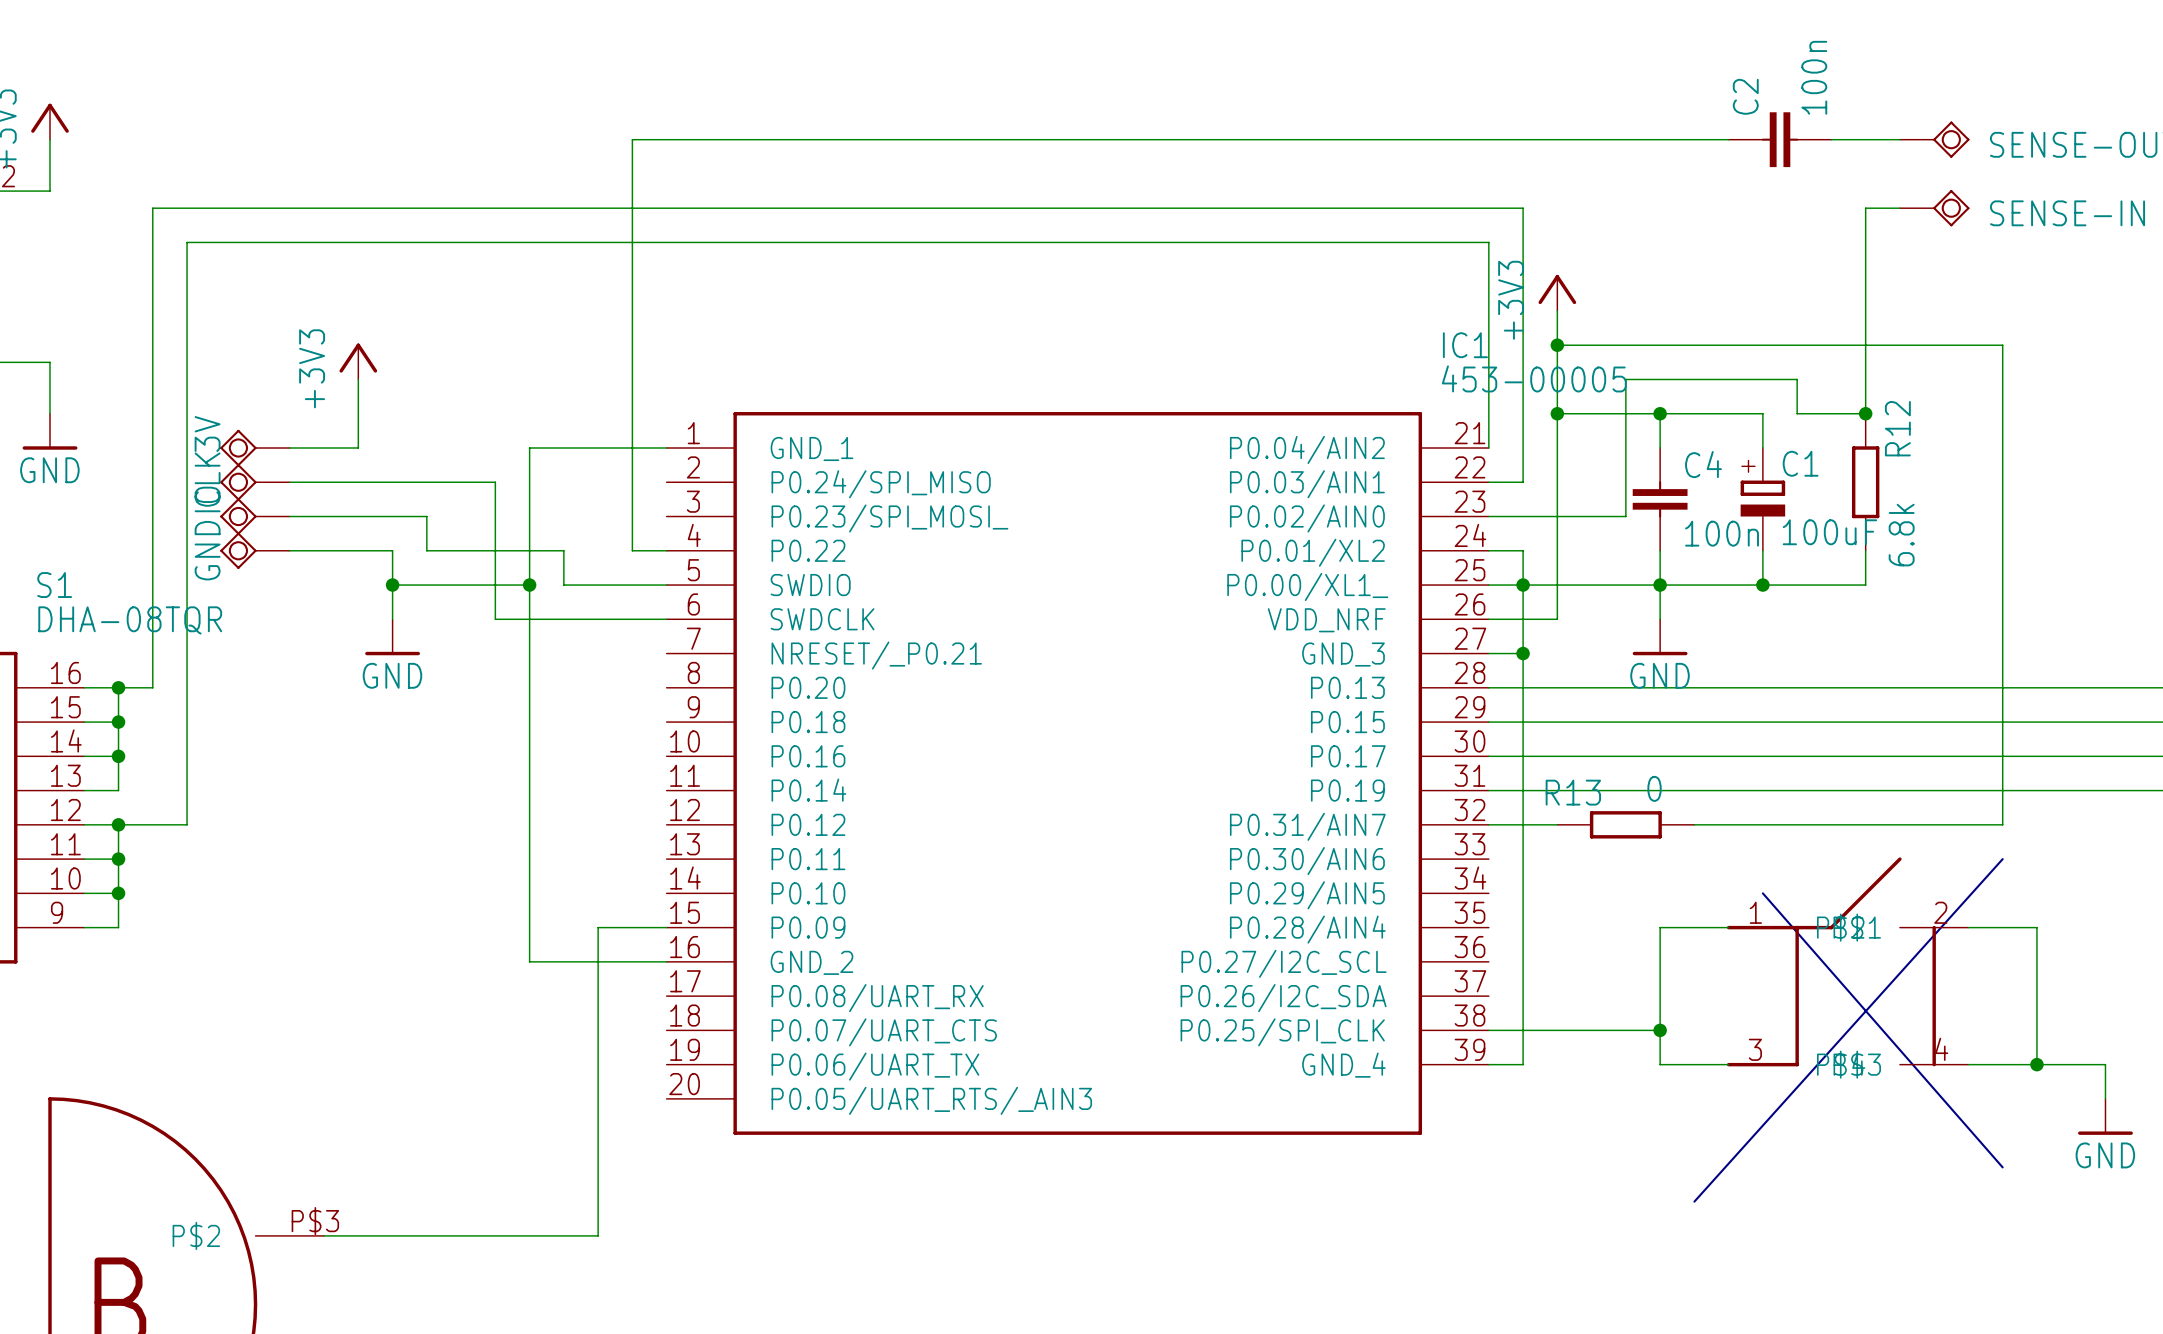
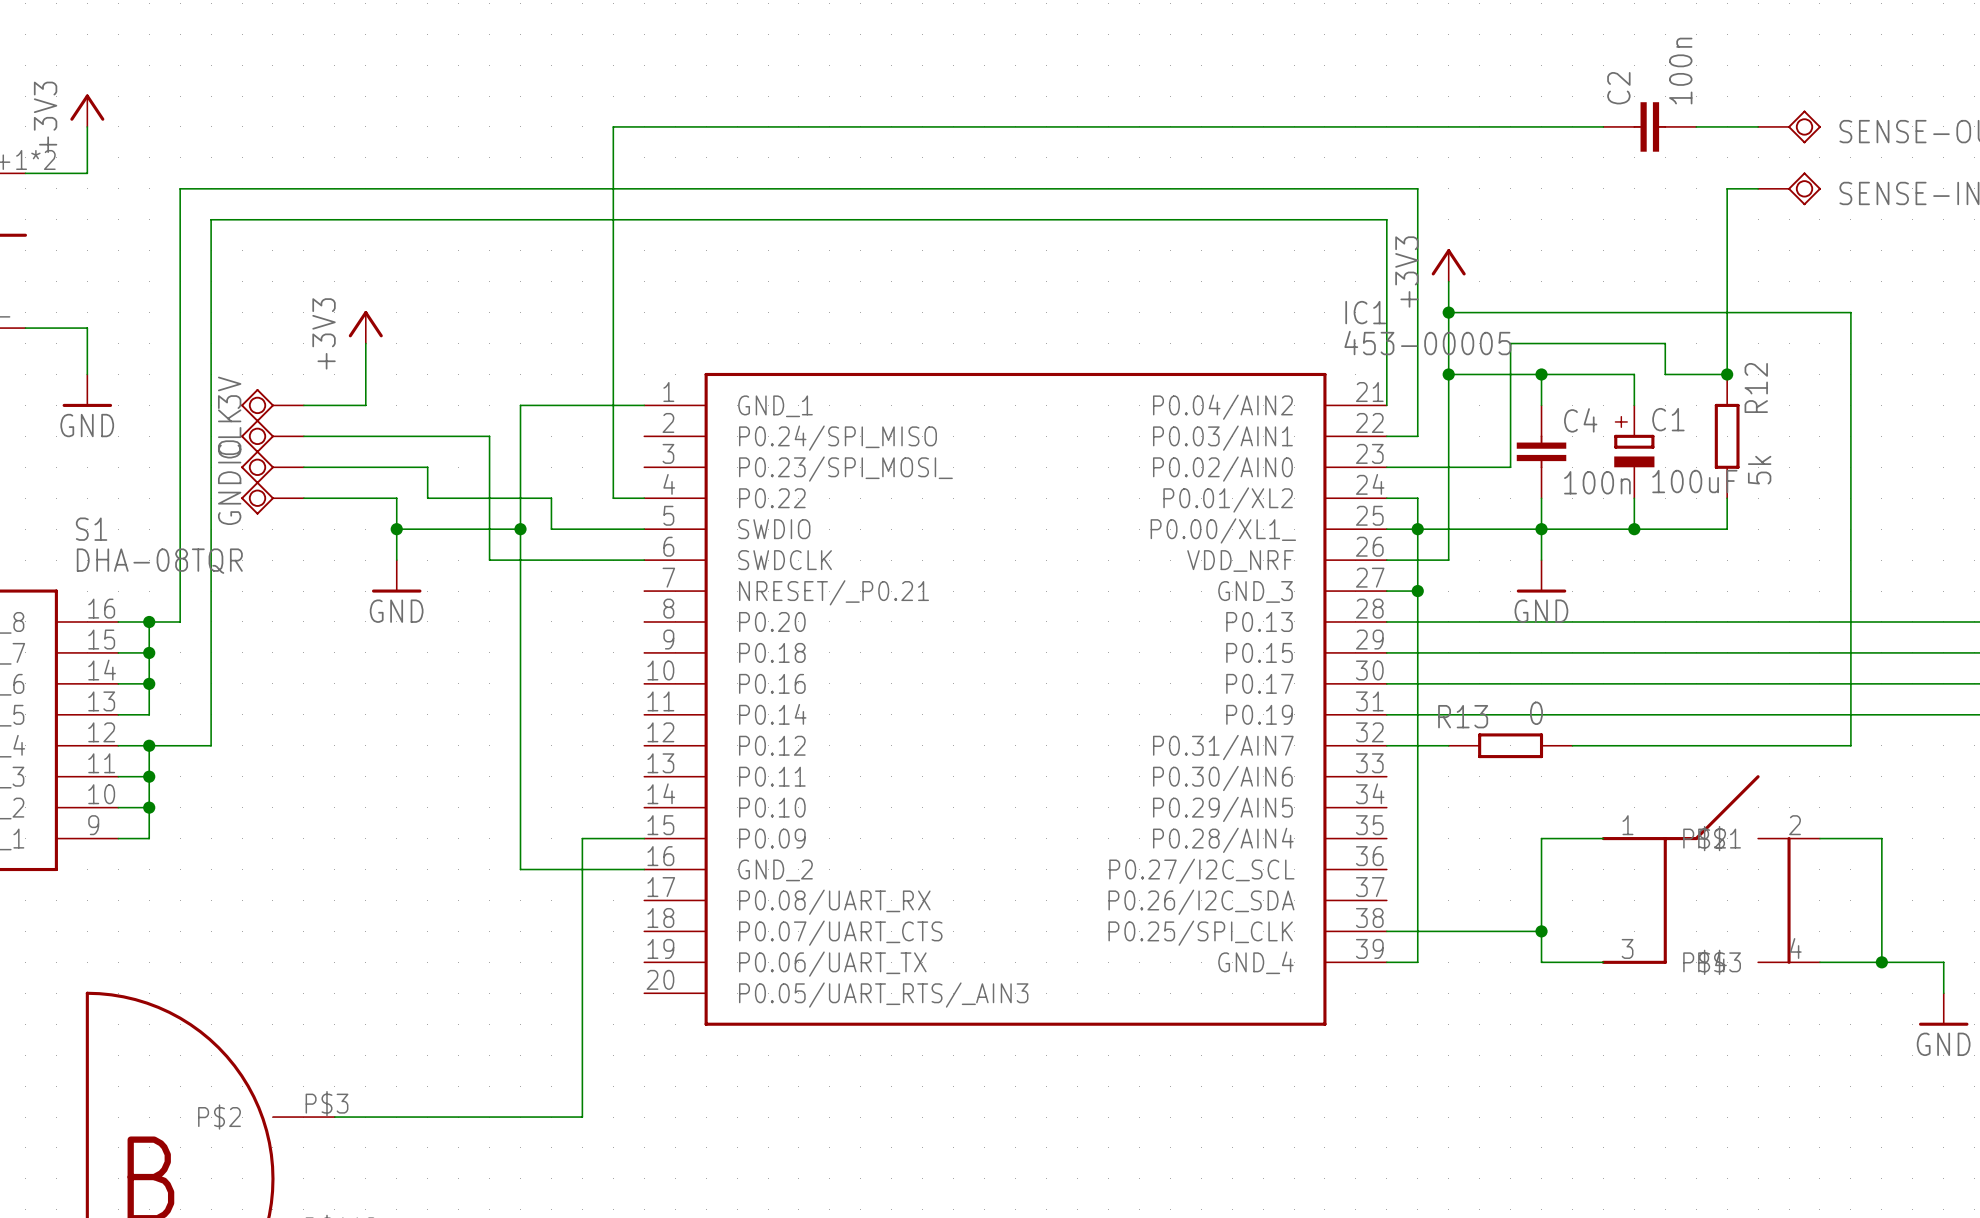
R12 value: 6.8k (1901, 535) -> 5k (1759, 470)
line: (2002, 859) (1694, 1201) -> none
line: (1762, 893) (2002, 1167) -> none

